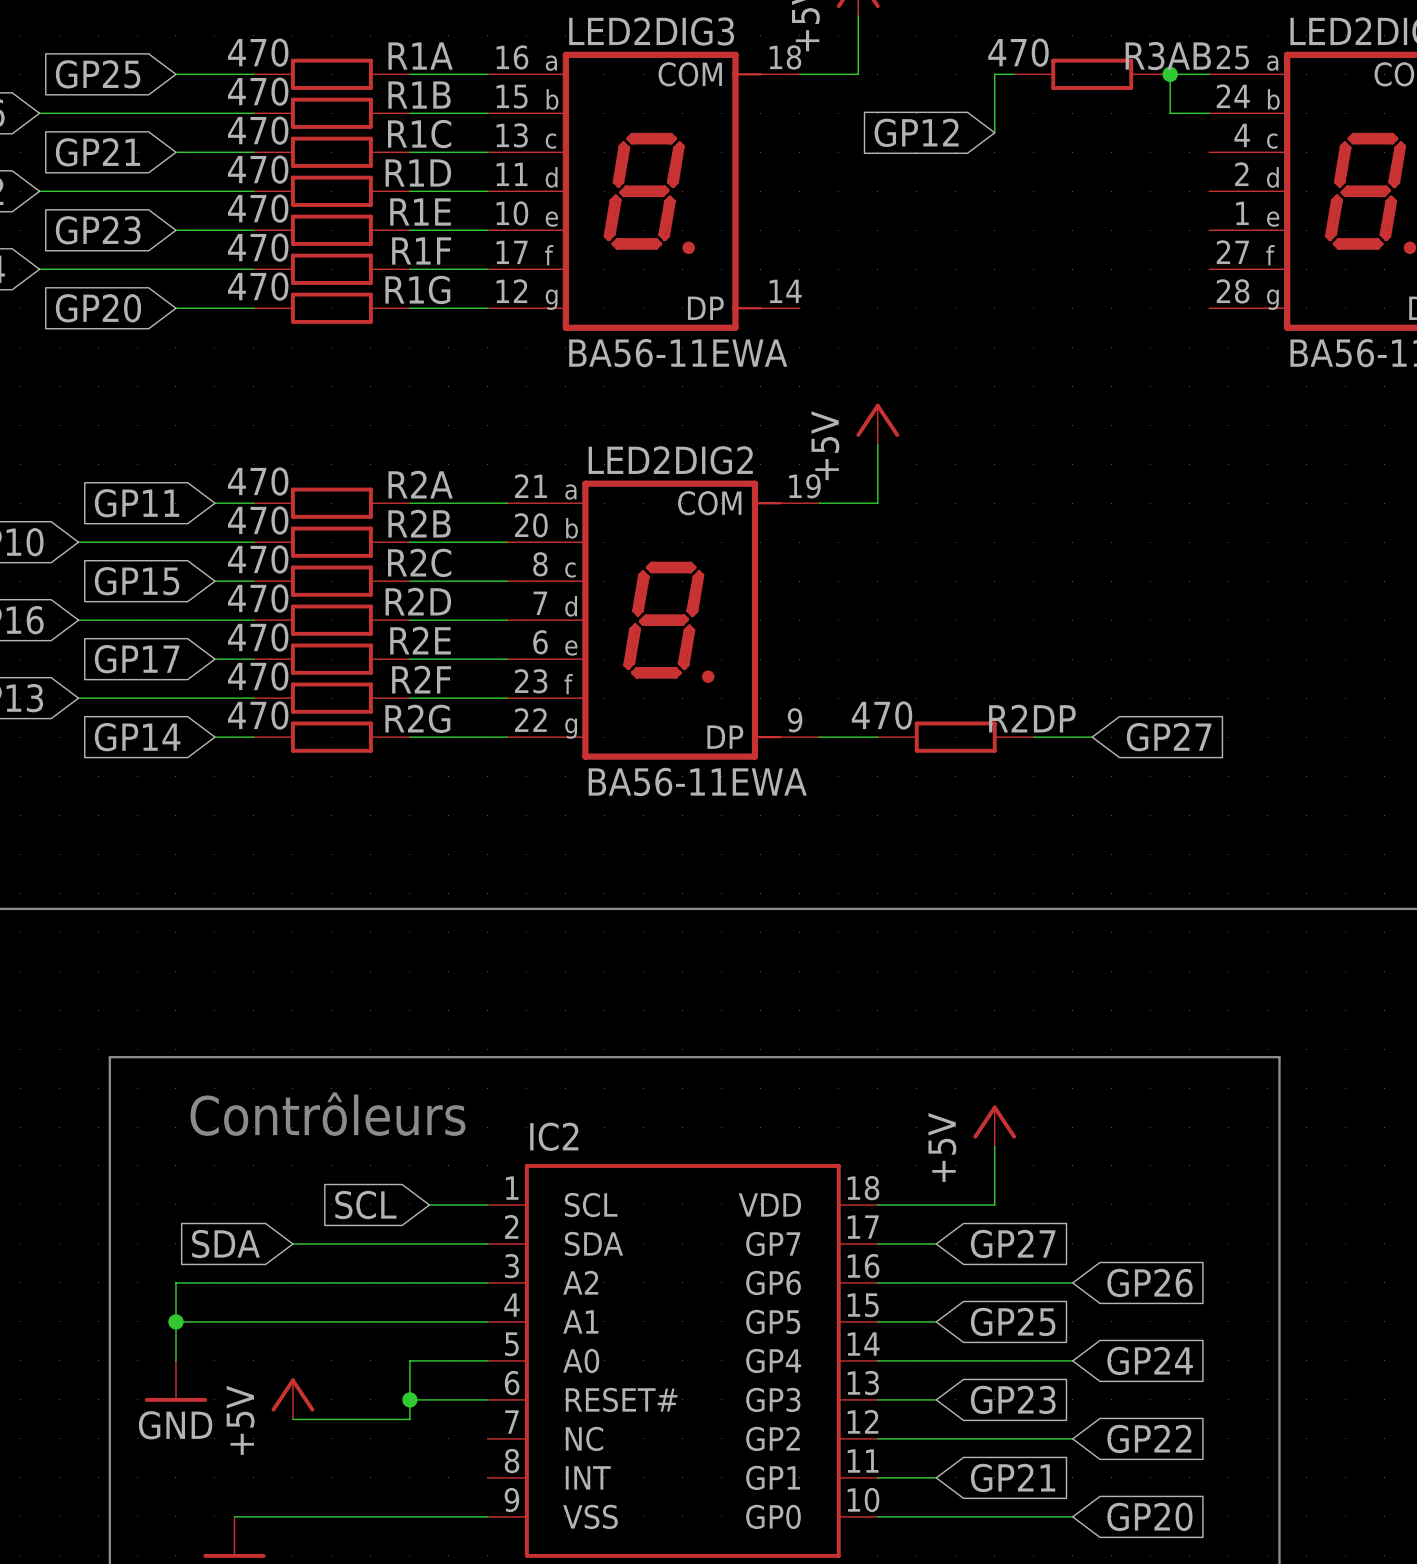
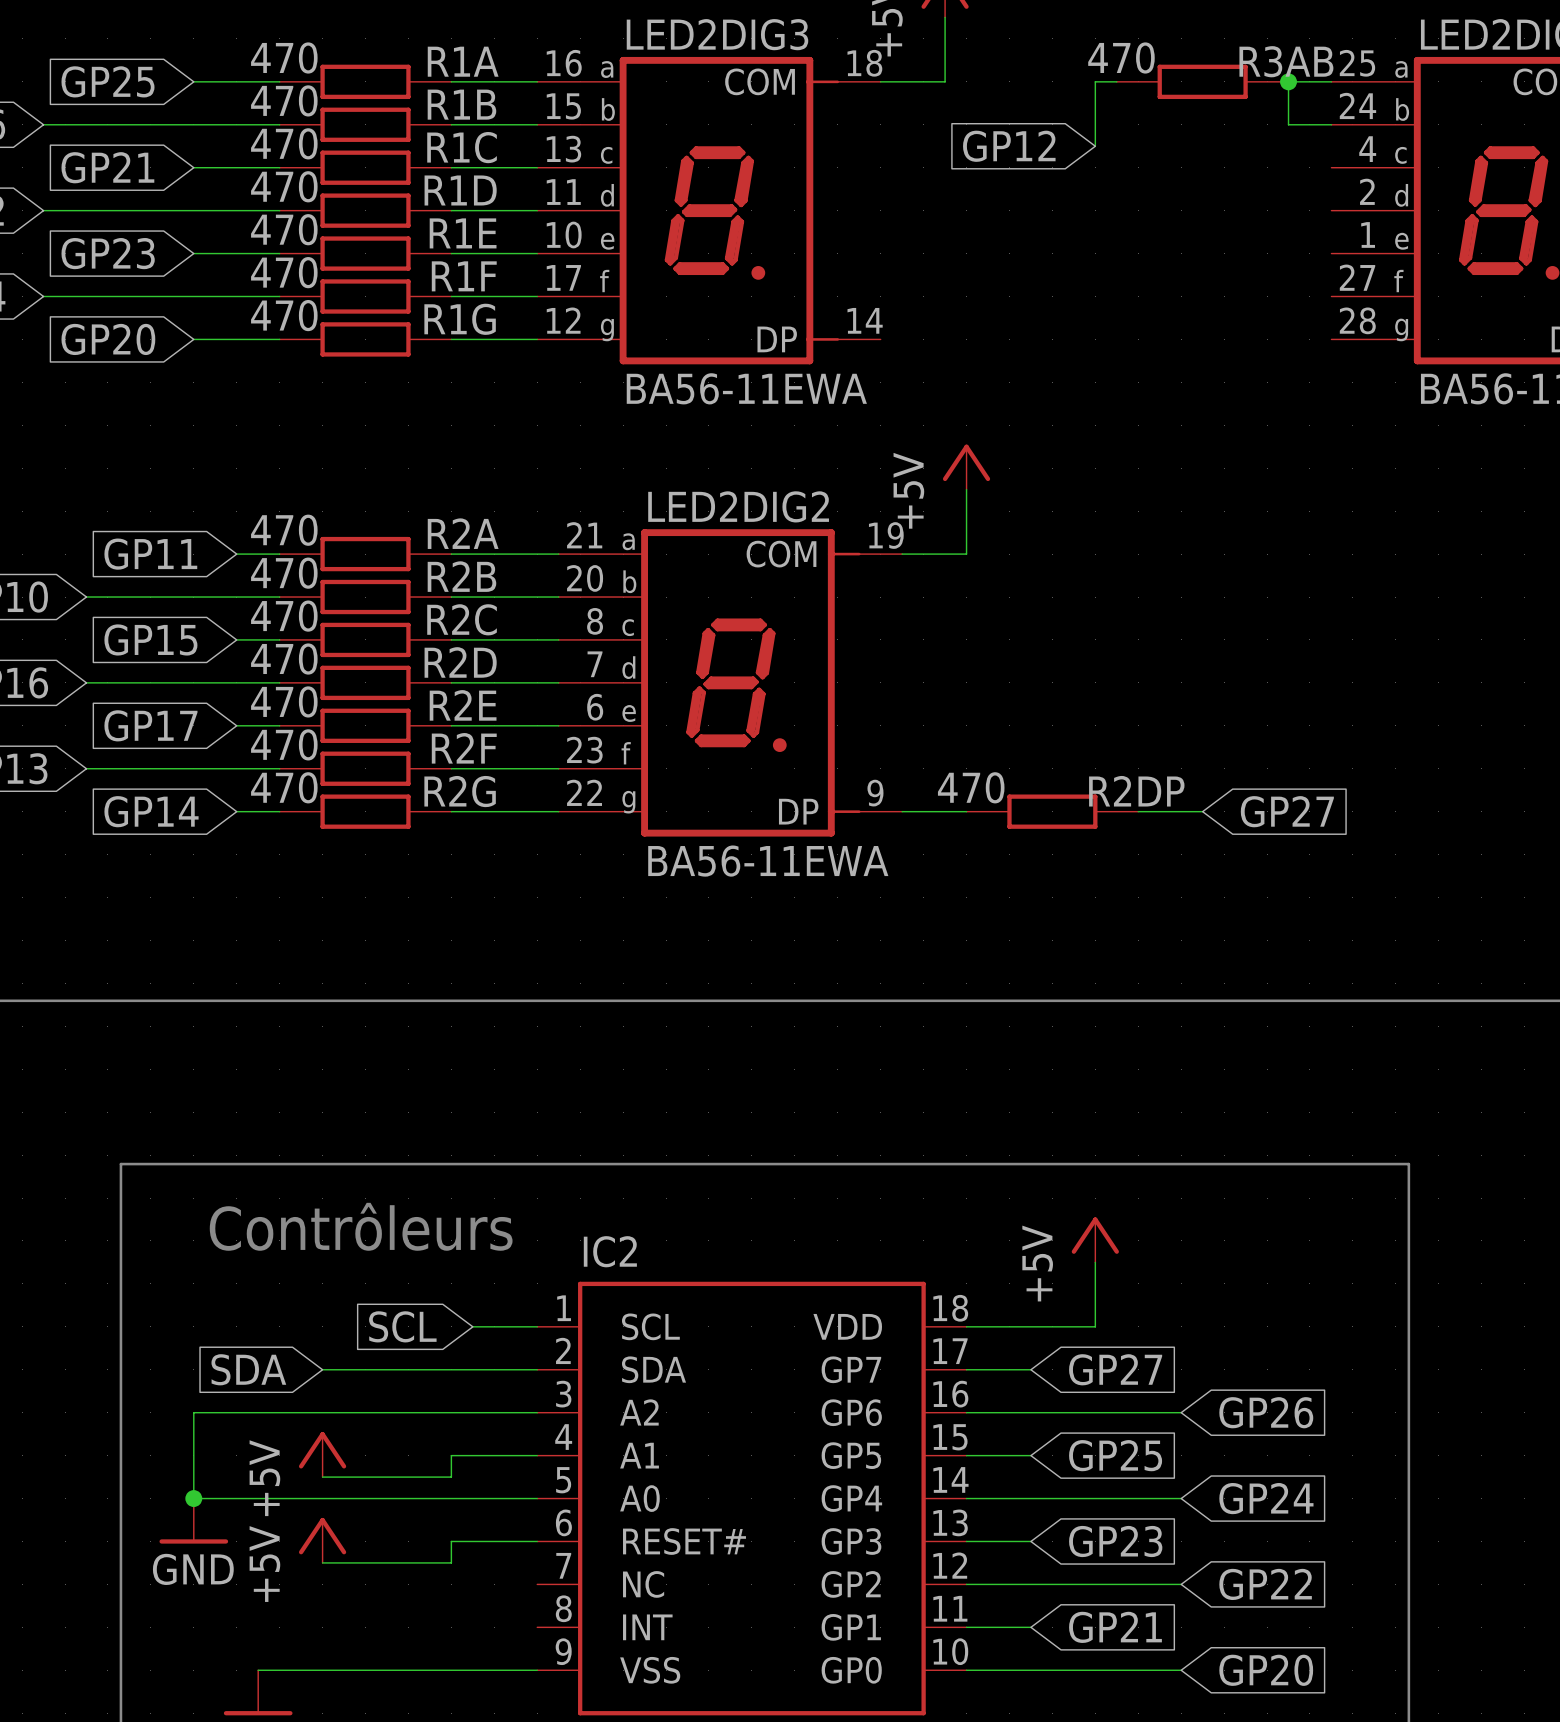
power symbol: none -> +5V (322, 1454)
wire: (175, 1321) (409, 1321) -> (322, 1477) (451, 1477) (451, 1455)
junction position: (175, 1321) -> (193, 1498)
wire: (409, 1360) (409, 1399) -> (451, 1498) (193, 1498)
junction: (409, 1399) -> none

